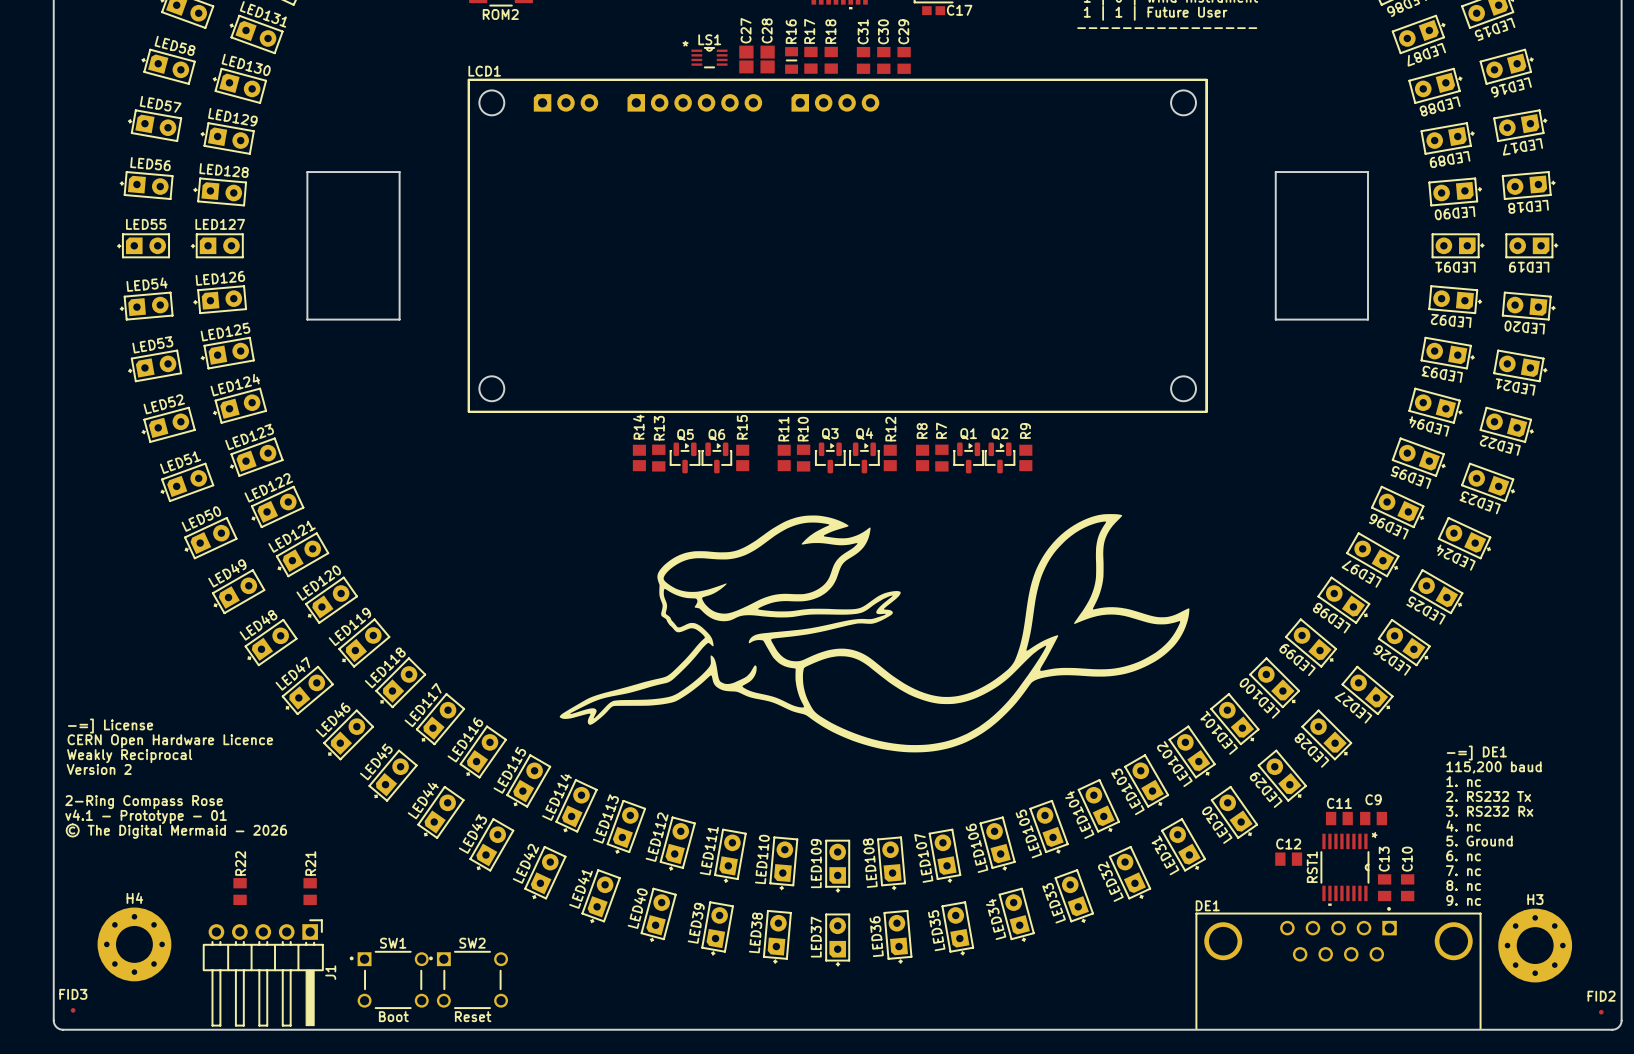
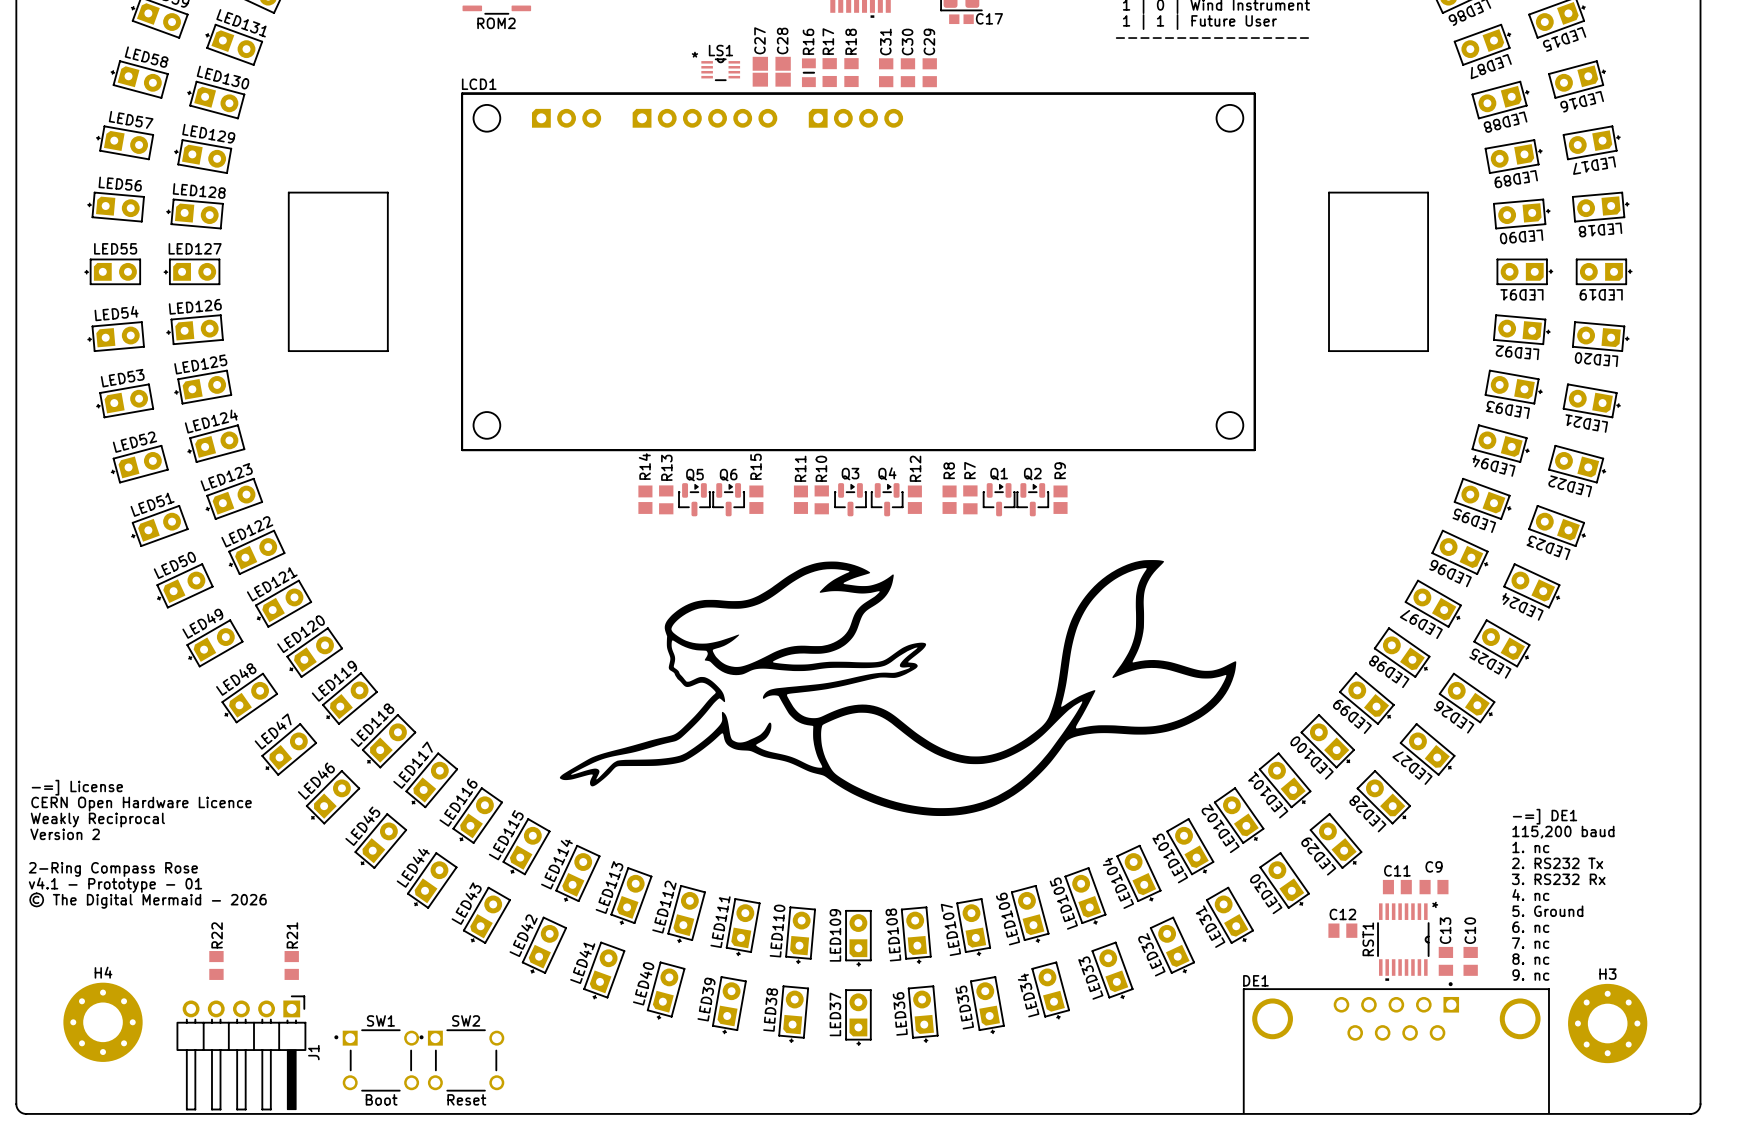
FID3: (73, 1010) -> none
FID2: (1601, 1012) -> none

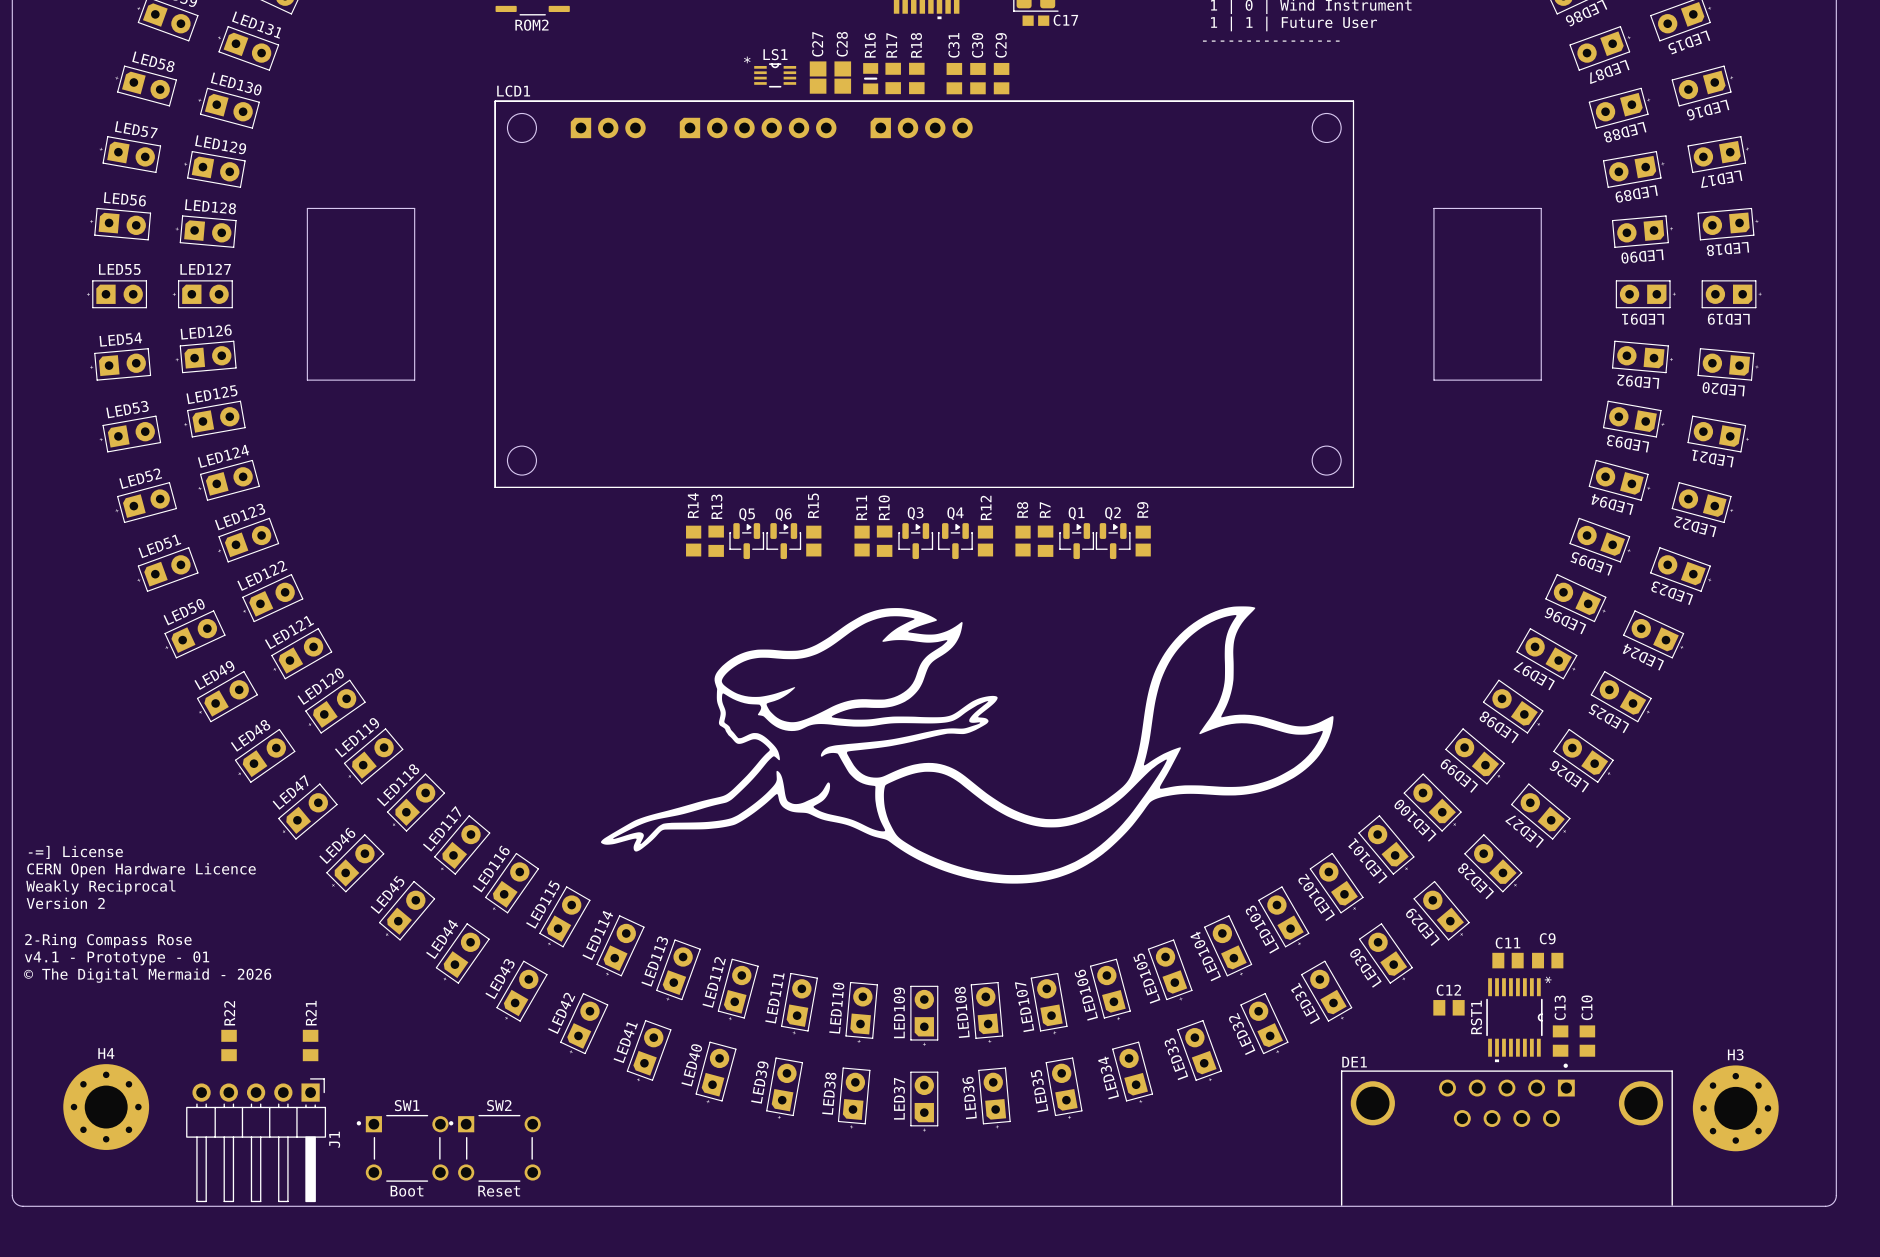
text: -=] DE1 (1545, 816) -> none
text: 115,200 baud (1563, 832) -> none
text: 1. nc (1530, 847) -> none
text: 2. RS232 Tx (1557, 863) -> none
text: 3. RS232 Rx (1558, 879) -> none
text: 4. nc (1530, 895) -> none
text: 5. Ground (1547, 911) -> none
text: 6. nc (1530, 927) -> none
text: 7. nc (1530, 943) -> none
text: 8. nc (1530, 959) -> none
text: 9. nc (1530, 975) -> none

